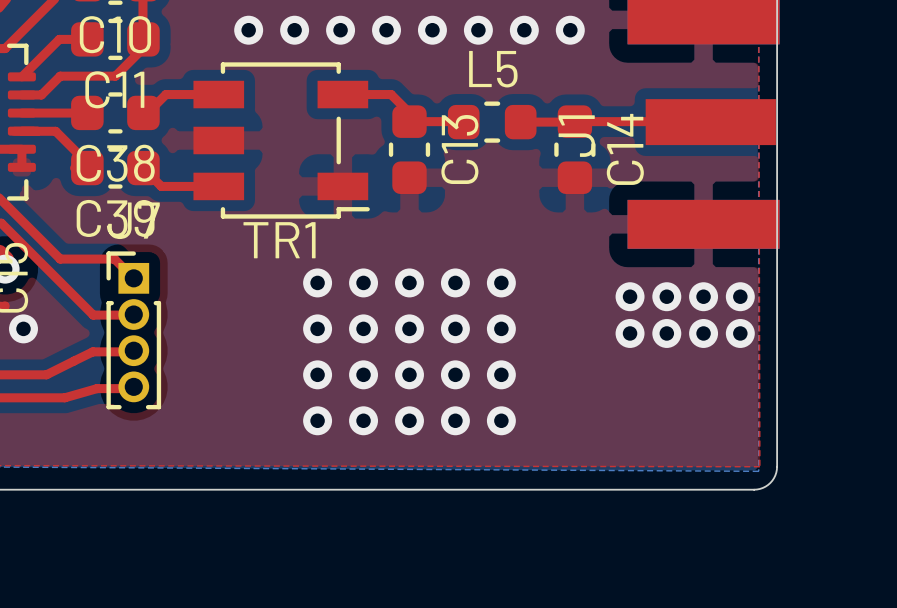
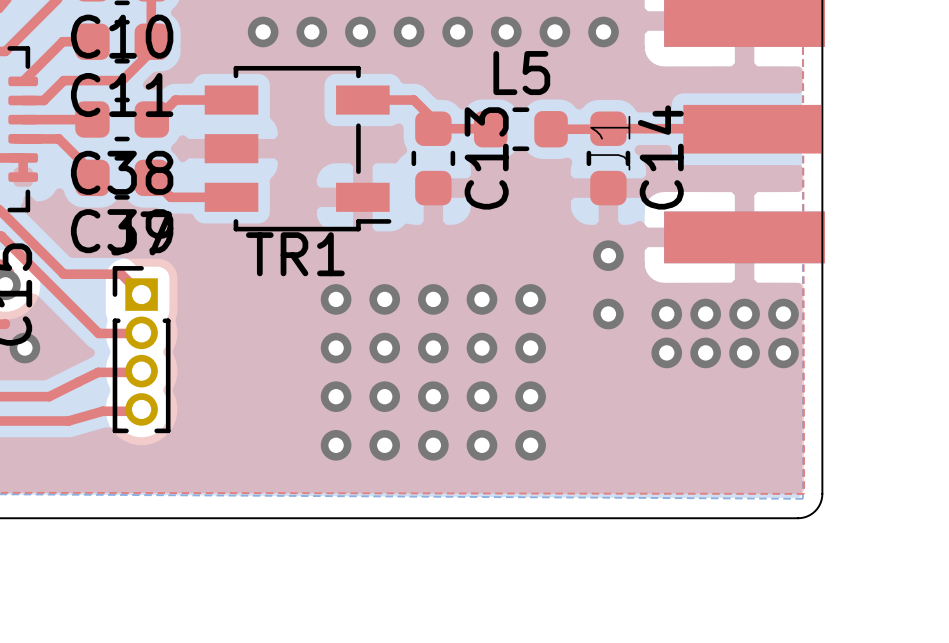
via: none -> (608, 255)
via: none -> (608, 314)

